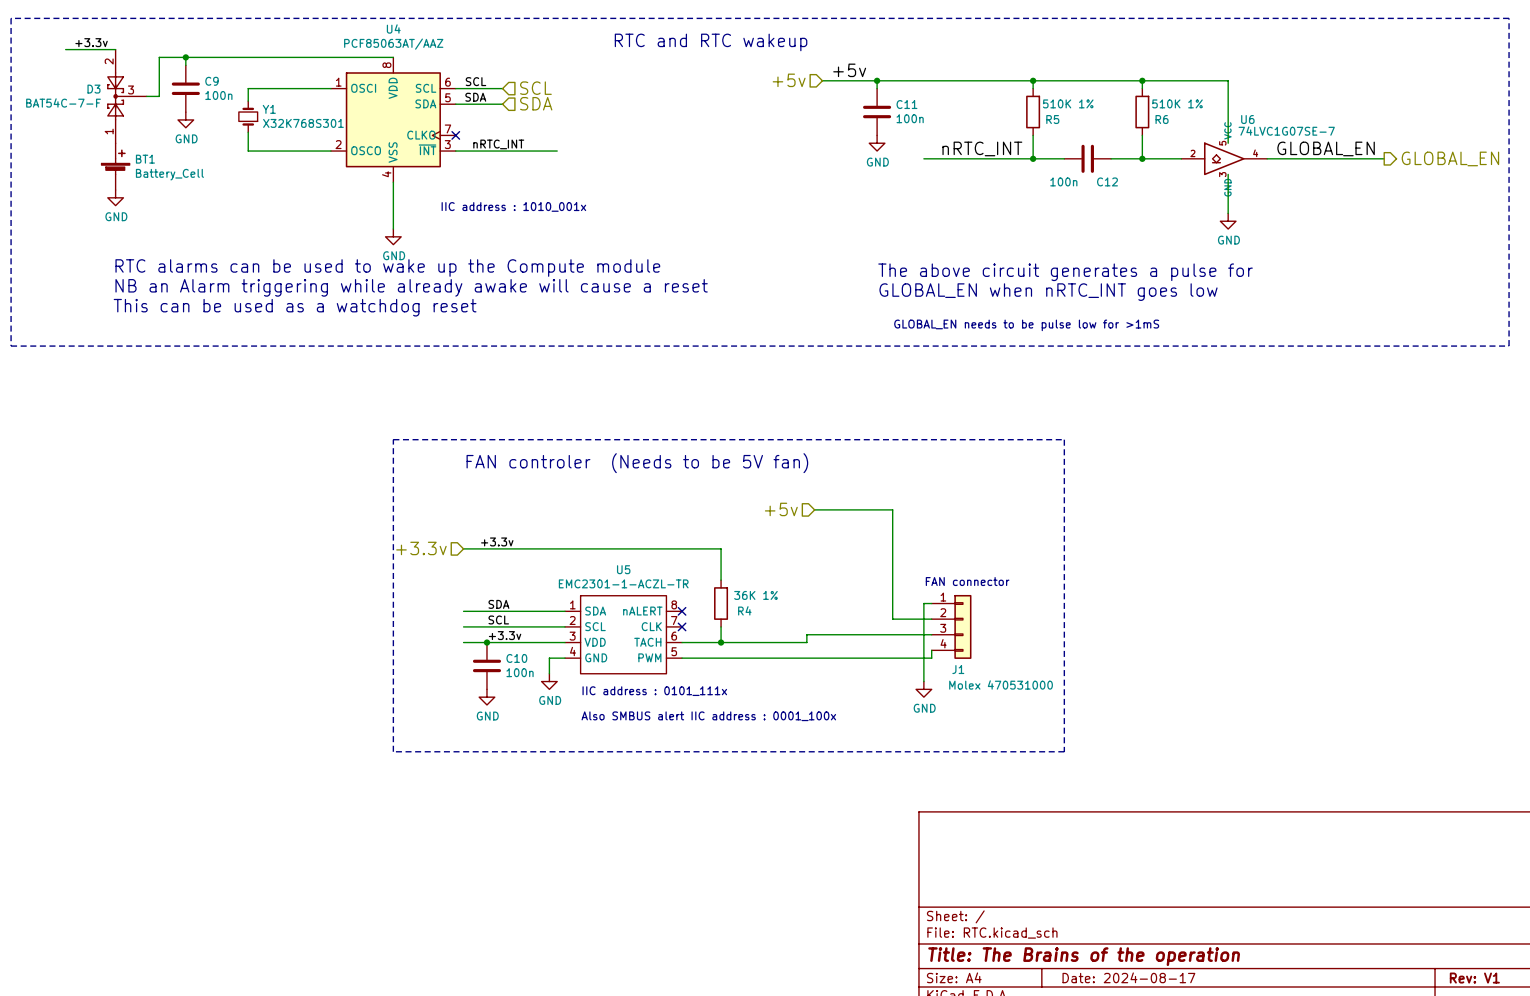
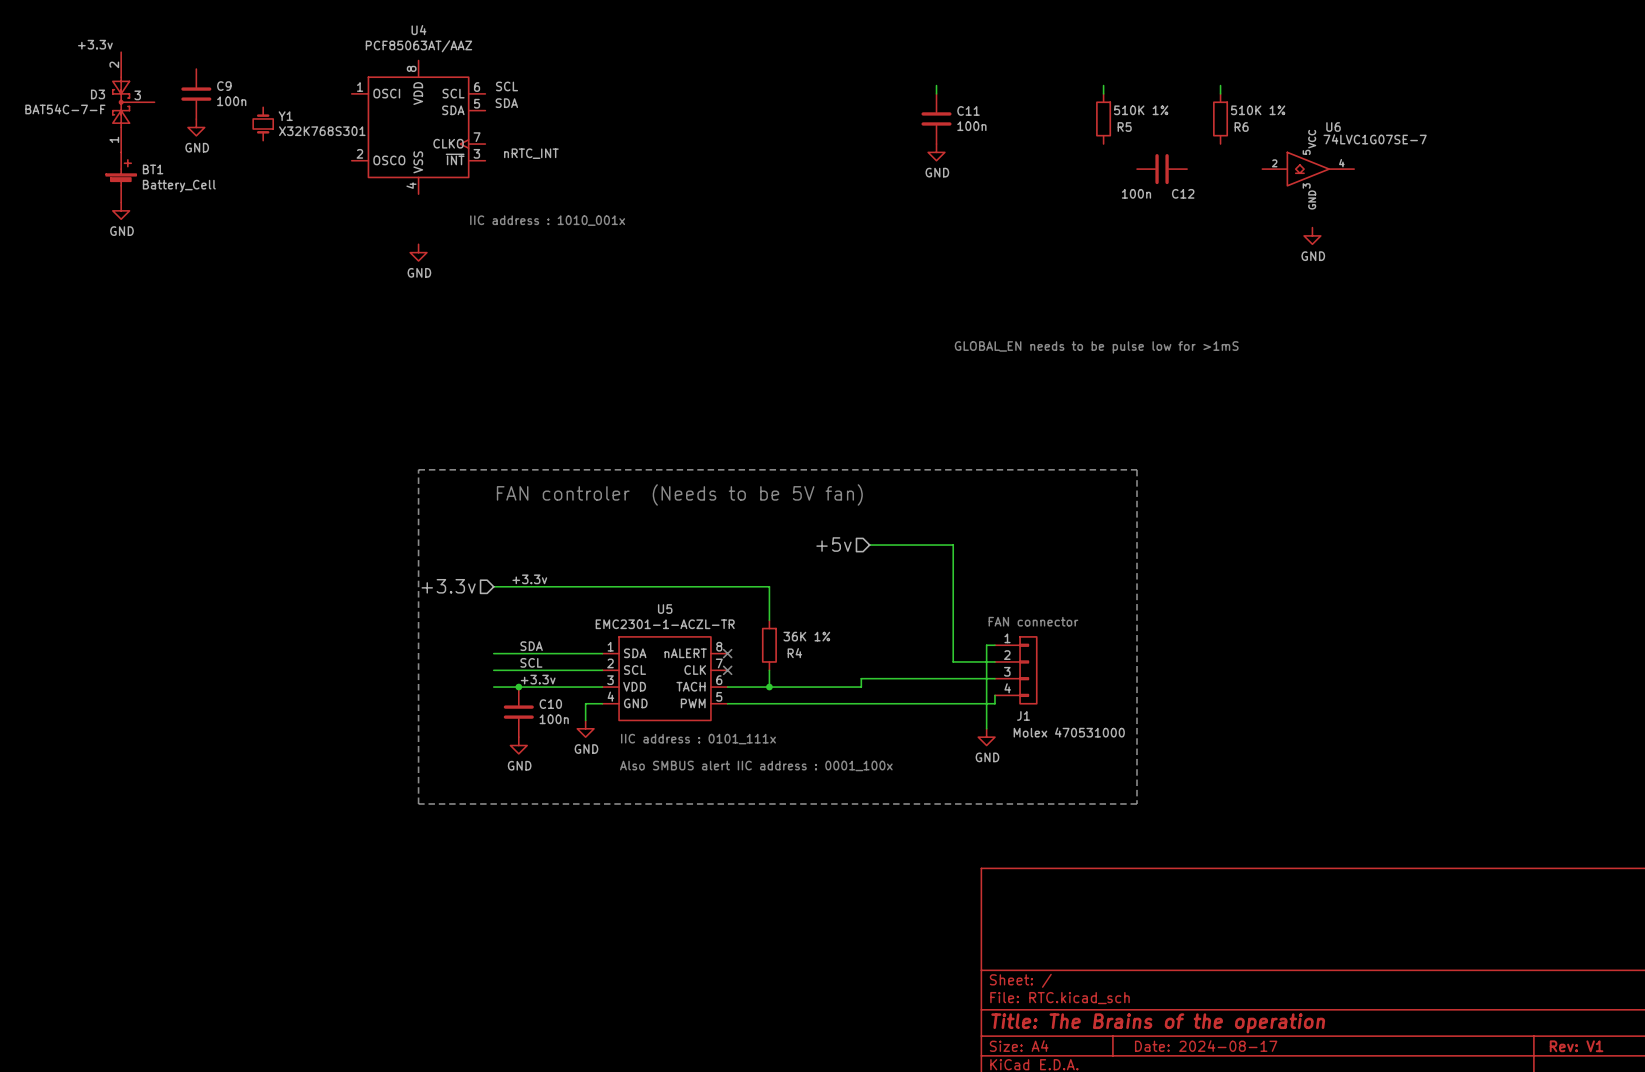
line: (11, 18) (1509, 18) (1509, 346) (11, 346) (11, 18) -> none
text: RTC and RTC wakeup (711, 42) -> none
wire: (65, 49) (115, 49) -> none
wire: (185, 57) (185, 65) -> none
junction: (185, 57) -> none
wire: (393, 57) (159, 57) (159, 96) (146, 96) -> none
label: +5v (849, 70) -> none
hierarchical label: +5v (789, 80) -> none
wire: (822, 80) (1228, 80) (1228, 143) -> none
junction: (877, 80) -> none
junction: (1033, 80) -> none
junction: (1142, 80) -> none
wire: (330, 88) (248, 88) (248, 101) -> none
wire: (455, 88) (502, 88) -> none
hierarchical label: SCL (535, 88) -> none
hierarchical label: SDA (536, 103) -> none
wire: (455, 104) (502, 104) -> none
wire: (248, 132) (248, 151) (330, 151) -> none
no-connect mark: (455, 135) -> none
wire: (1033, 135) (1033, 158) -> none
wire: (1142, 135) (1142, 158) -> none
label: nRTC_INT (982, 148) -> none
label: GLOBAL_EN (1326, 148) -> none
wire: (455, 151) (557, 151) -> none
wire: (923, 158) (1064, 158) -> none
junction: (1033, 158) -> none
wire: (1111, 158) (1181, 158) -> none
junction: (1142, 158) -> none
wire: (1267, 158) (1384, 158) -> none
hierarchical label: GLOBAL_EN (1450, 158) -> none
wire: (1228, 174) (1228, 213) -> none
wire: (393, 182) (393, 229) -> none
text: RTC alarms can be used to wake up the Compute module (387, 268) -> none
text: The above circuit generates a pulse for (1065, 272) -> none
text: NB an Alarm triggering while already awake will cause a reset (411, 287) -> none
text: GLOBAL_EN when nRTC_INT goes low (1048, 292) -> none
text: This can be used as a watchdog reset (295, 307) -> none

